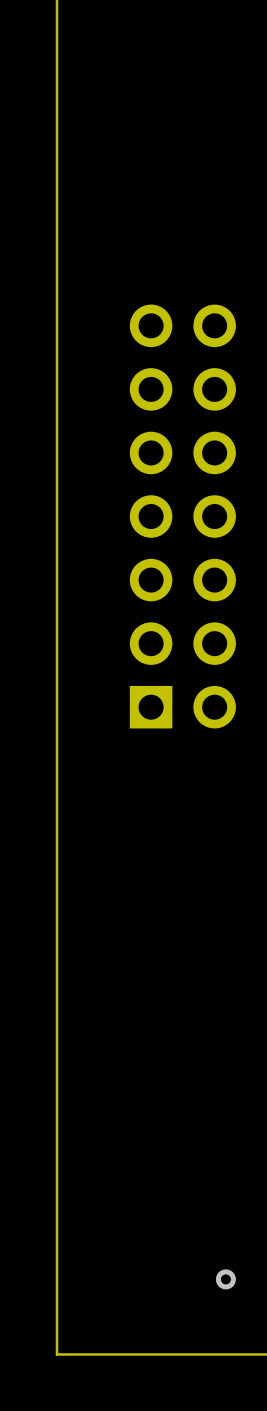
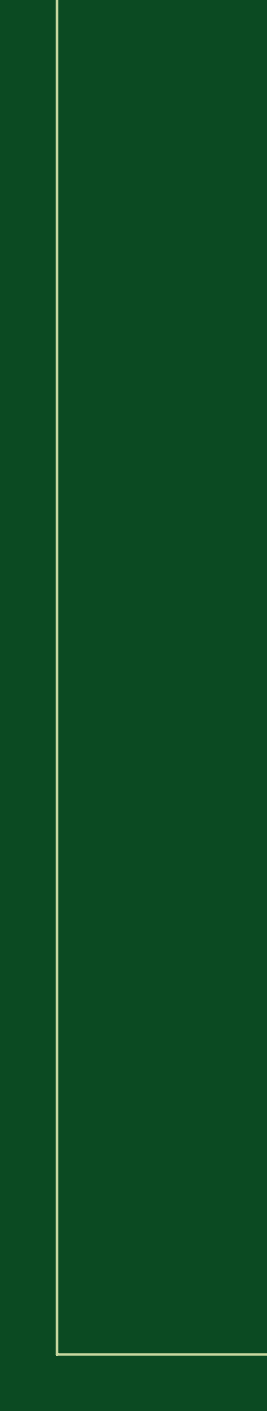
part: (182, 516) -> none
via: (225, 1279) -> none

